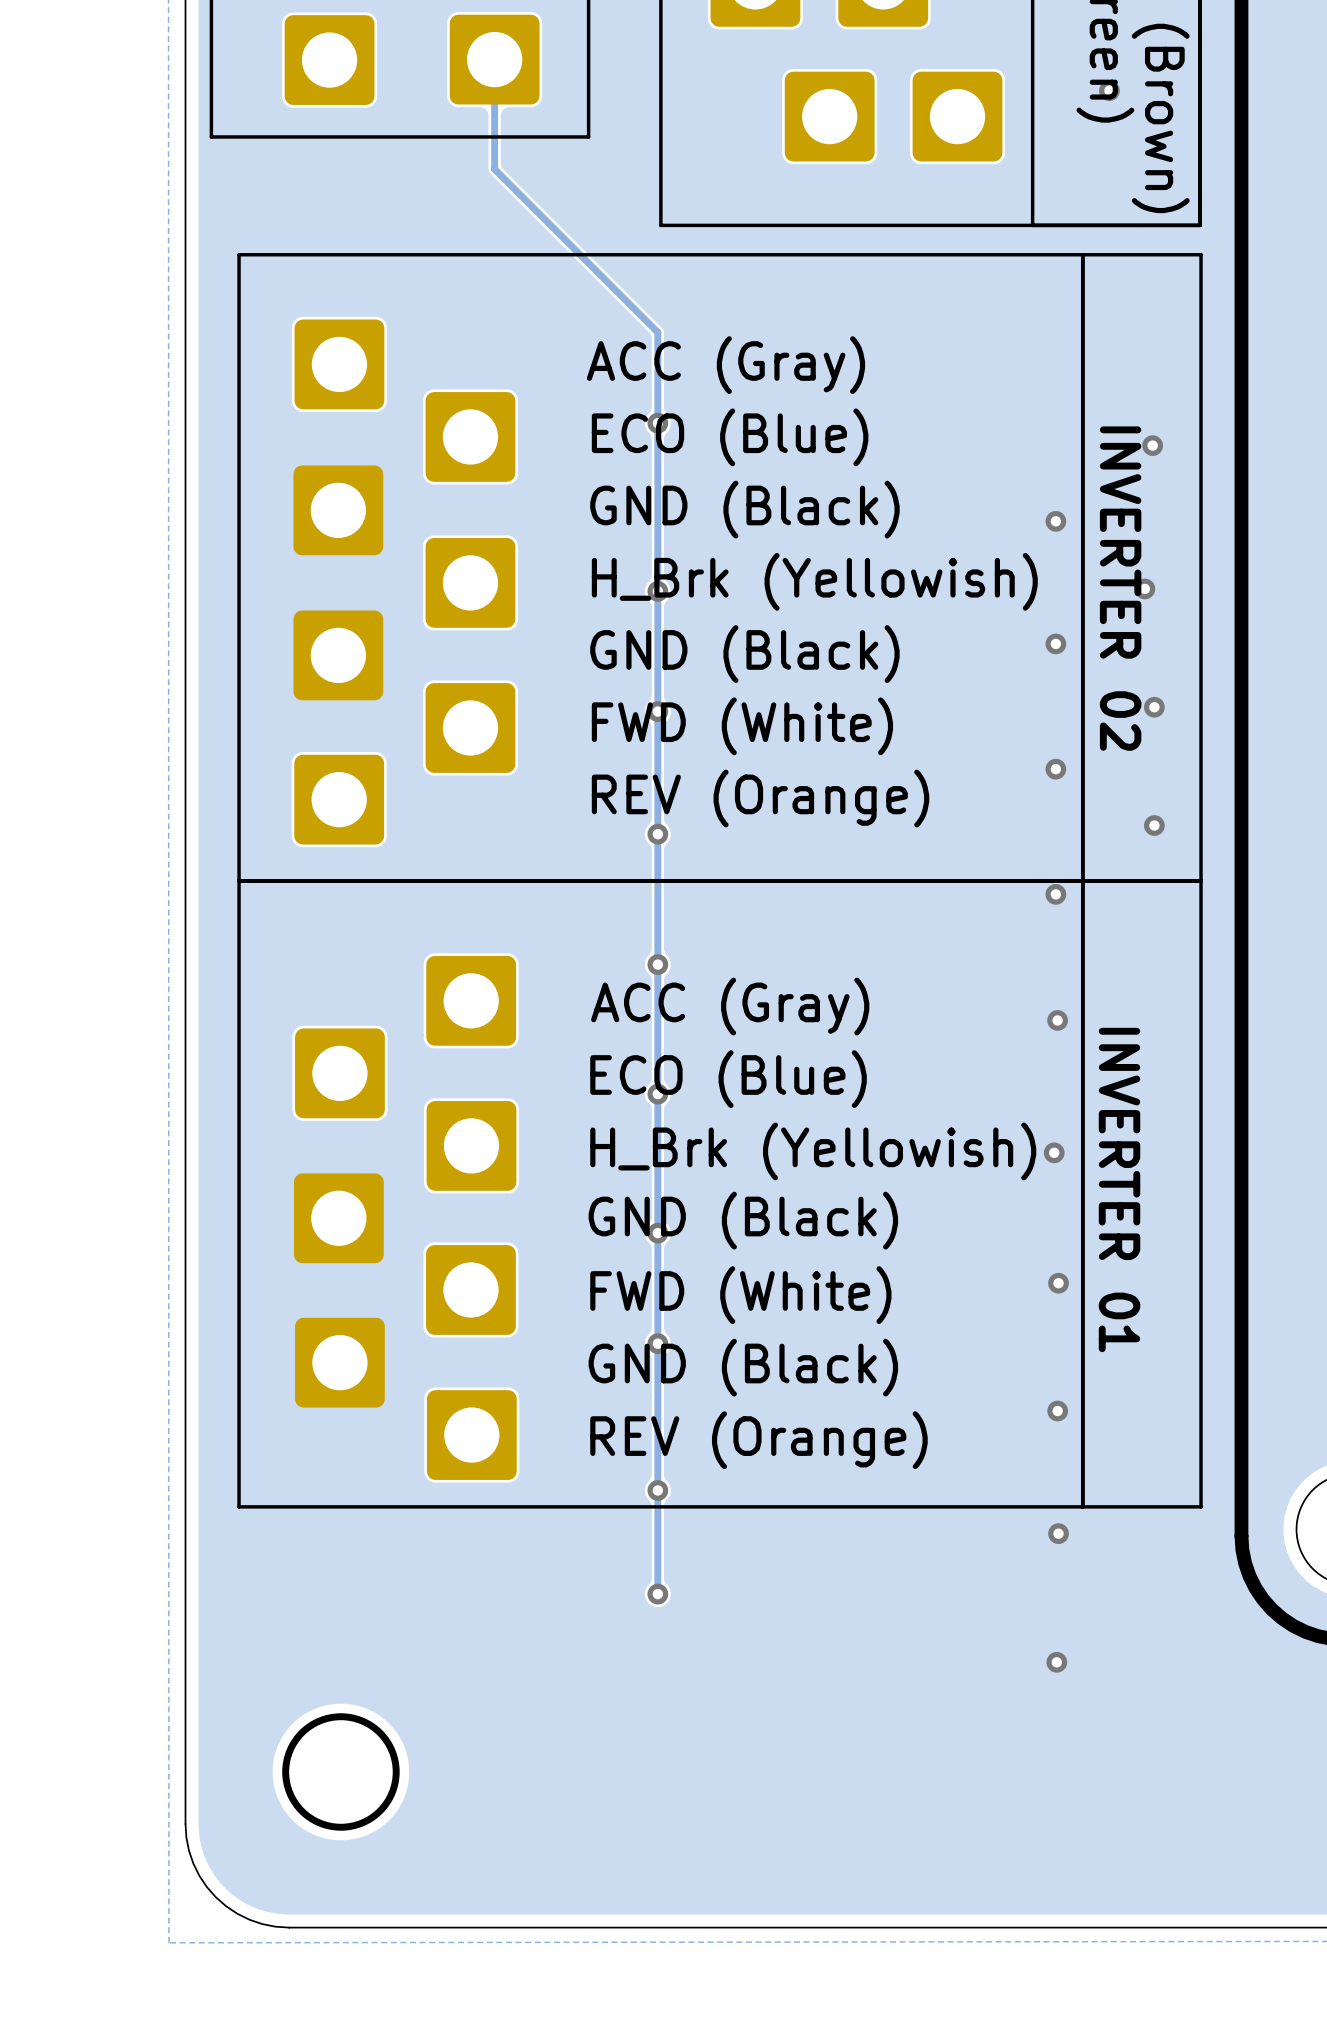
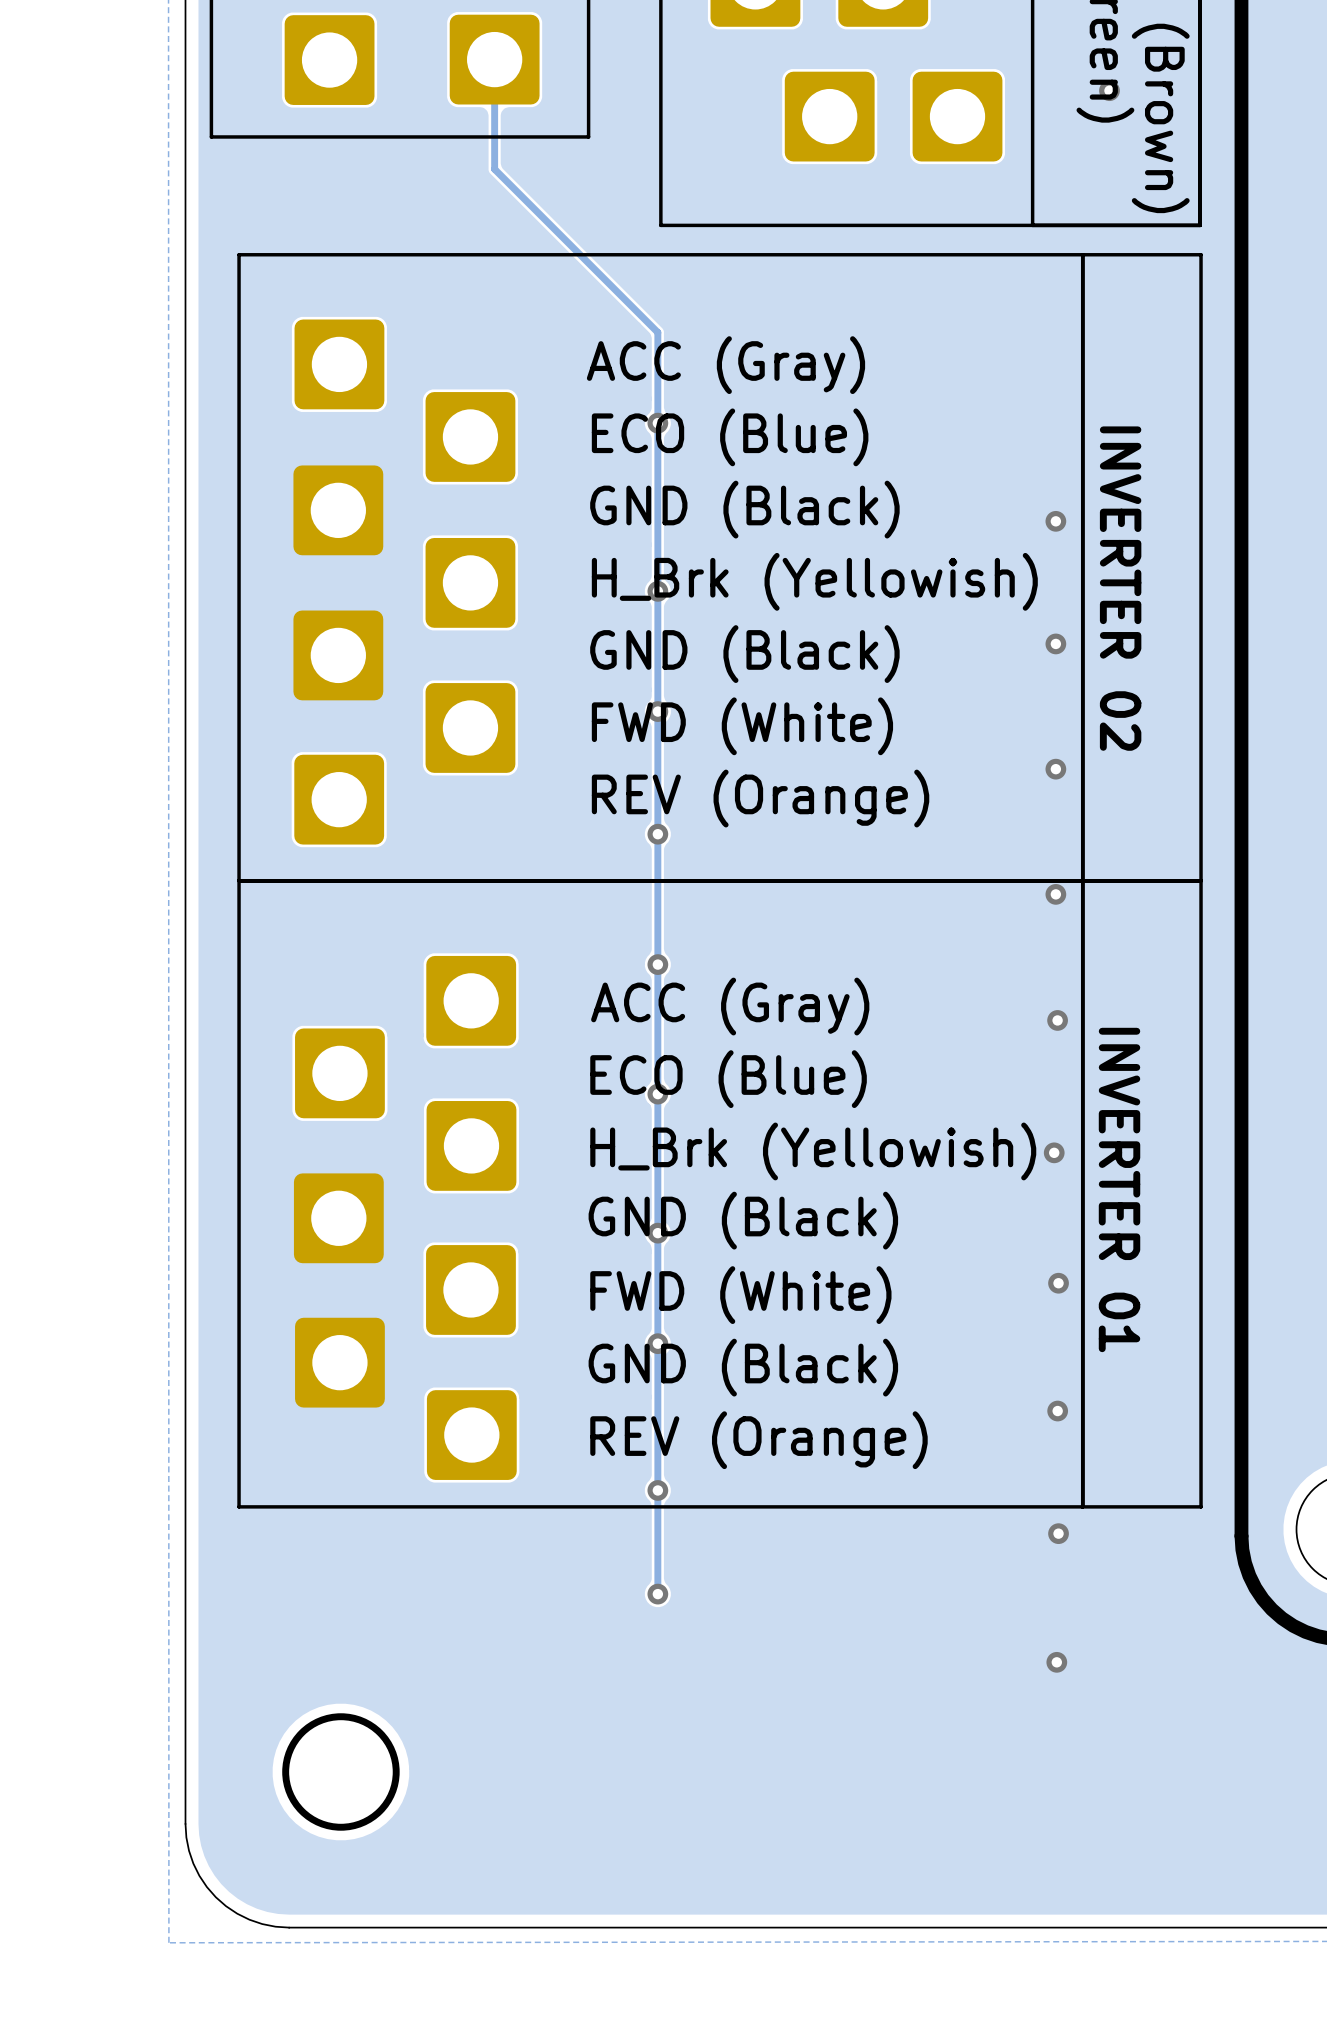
via: (1152, 445) -> none
via: (1144, 588) -> none
via: (1154, 707) -> none
via: (1154, 825) -> none

